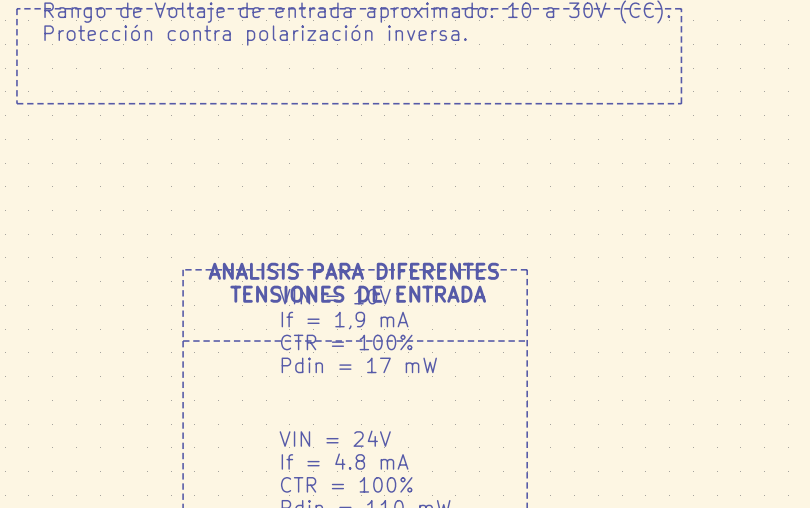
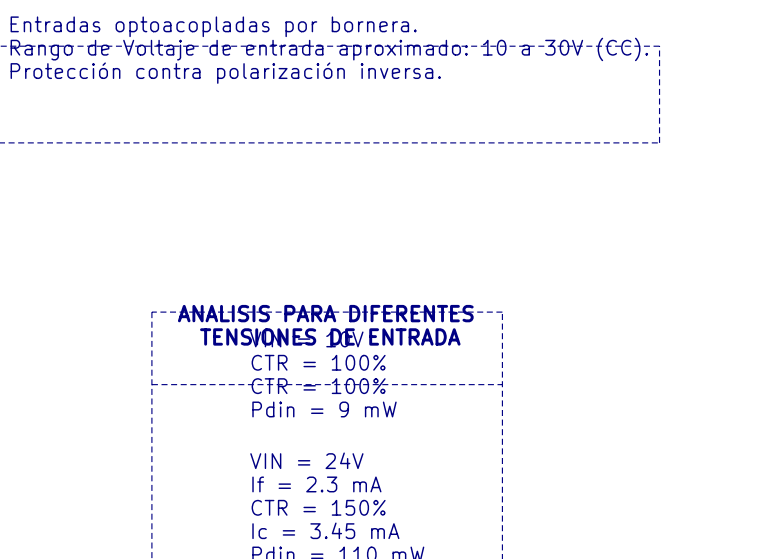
text: If = 1,9 mA (345, 320) -> CTR = 100% (318, 362)
text: Pdin = 17 mW (359, 365) -> Pdin = 9 mW (324, 409)
text: none -> VIN = 24V (306, 460)
text: VIN = 24V (335, 438) -> If = 2.3 mA (316, 484)
text: If = 4.8 mA (345, 461) -> CTR = 150% (318, 507)
text: CTR = 100% (346, 484) -> Ic = 3.45 mA (325, 530)

